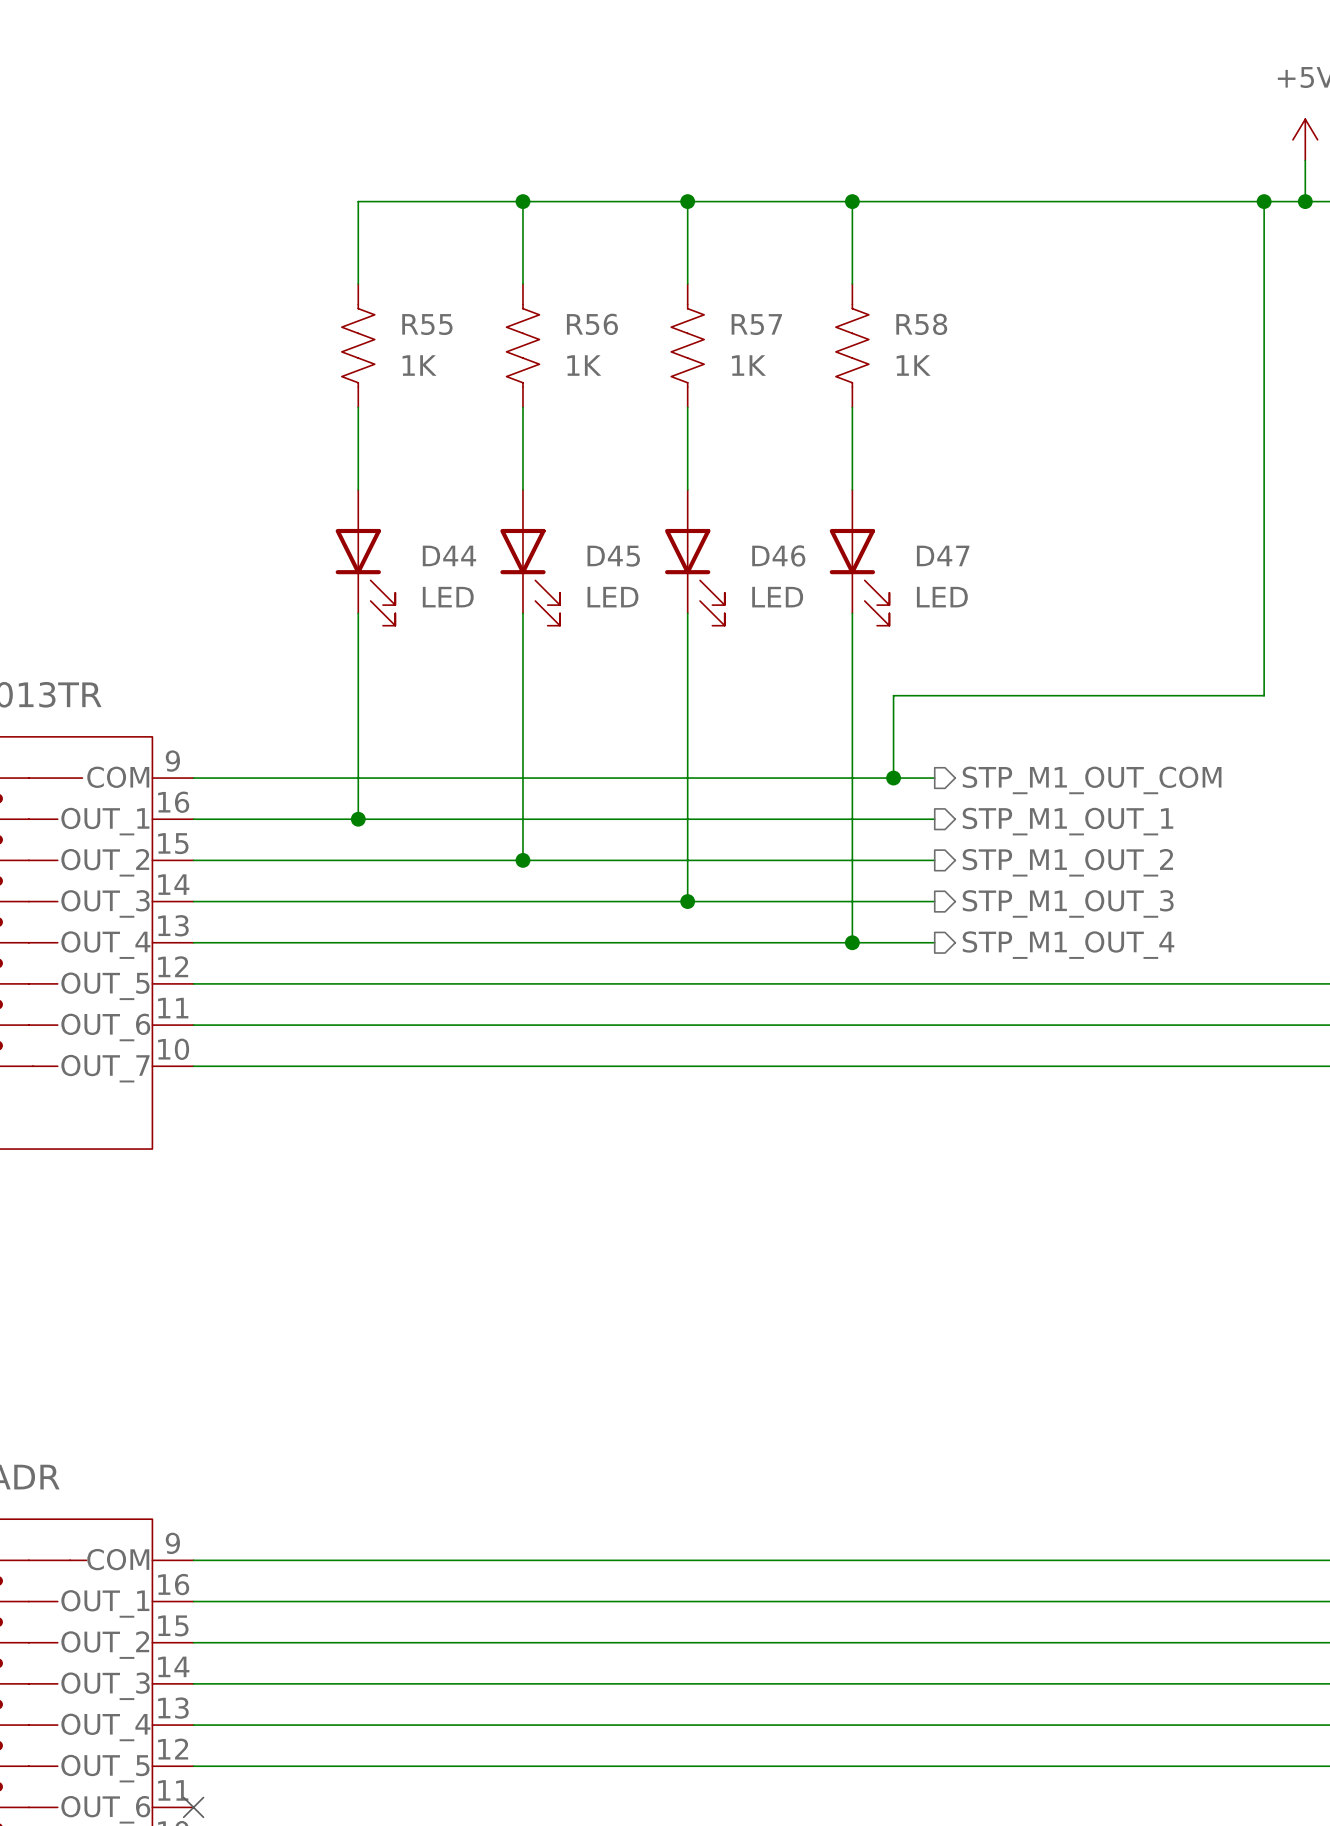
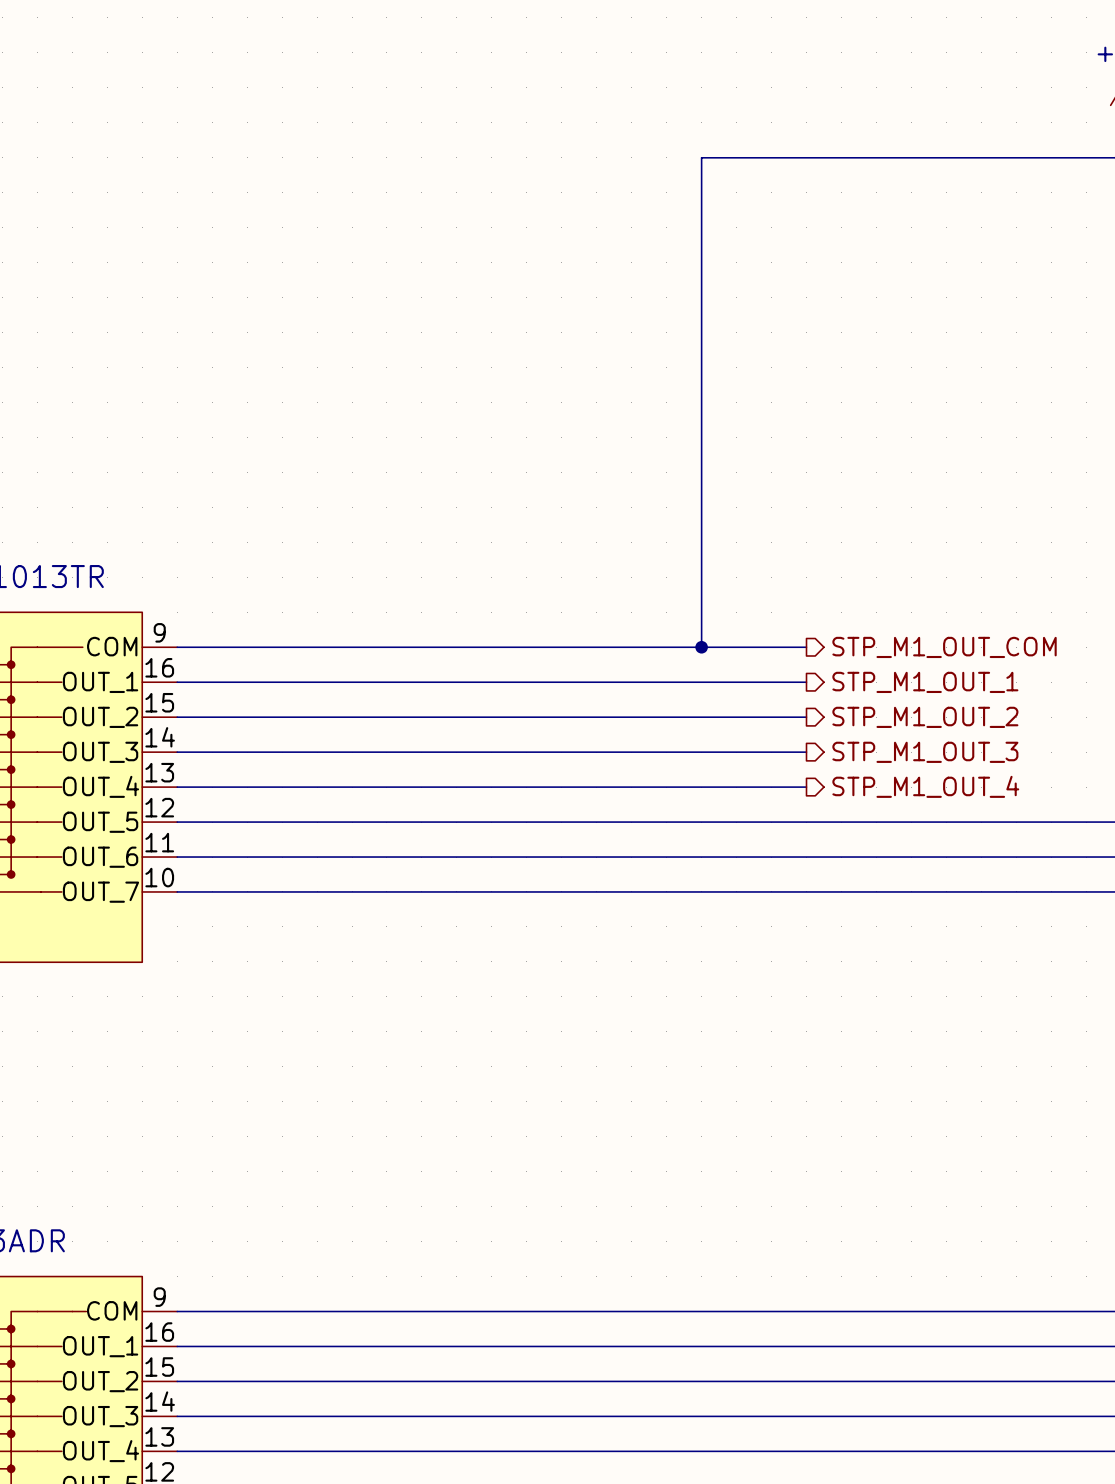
wire: (522, 201) (522, 283) -> none
junction: (522, 201) -> none
wire: (687, 201) (687, 283) -> none
junction: (687, 201) -> none
wire: (811, 201) (358, 201) (358, 283) -> (701, 157) (701, 647)
wire: (852, 201) (852, 283) -> none
junction: (852, 201) -> none
wire: (1264, 201) (1264, 695) (893, 695) (893, 778) -> none
junction: (1264, 201) -> none
R55: 1K (358, 345) -> none
R56: 1K (522, 345) -> none
R57: 1K (687, 345) -> none
R58: 1K (852, 345) -> none
wire: (358, 407) (358, 489) -> none
wire: (522, 407) (522, 489) -> none
wire: (687, 407) (687, 489) -> none
wire: (852, 407) (852, 489) -> none
D44: LED (365, 557) -> none
D45: LED (530, 557) -> none
D46: LED (694, 557) -> none
D47: LED (859, 557) -> none
wire: (358, 613) (358, 819) -> none
wire: (522, 613) (522, 860) -> none
wire: (687, 613) (687, 901) -> none
wire: (852, 613) (852, 942) -> none
junction position: (893, 778) -> (701, 647)
junction: (358, 819) -> none
junction: (522, 860) -> none
junction: (687, 901) -> none
junction: (852, 942) -> none

